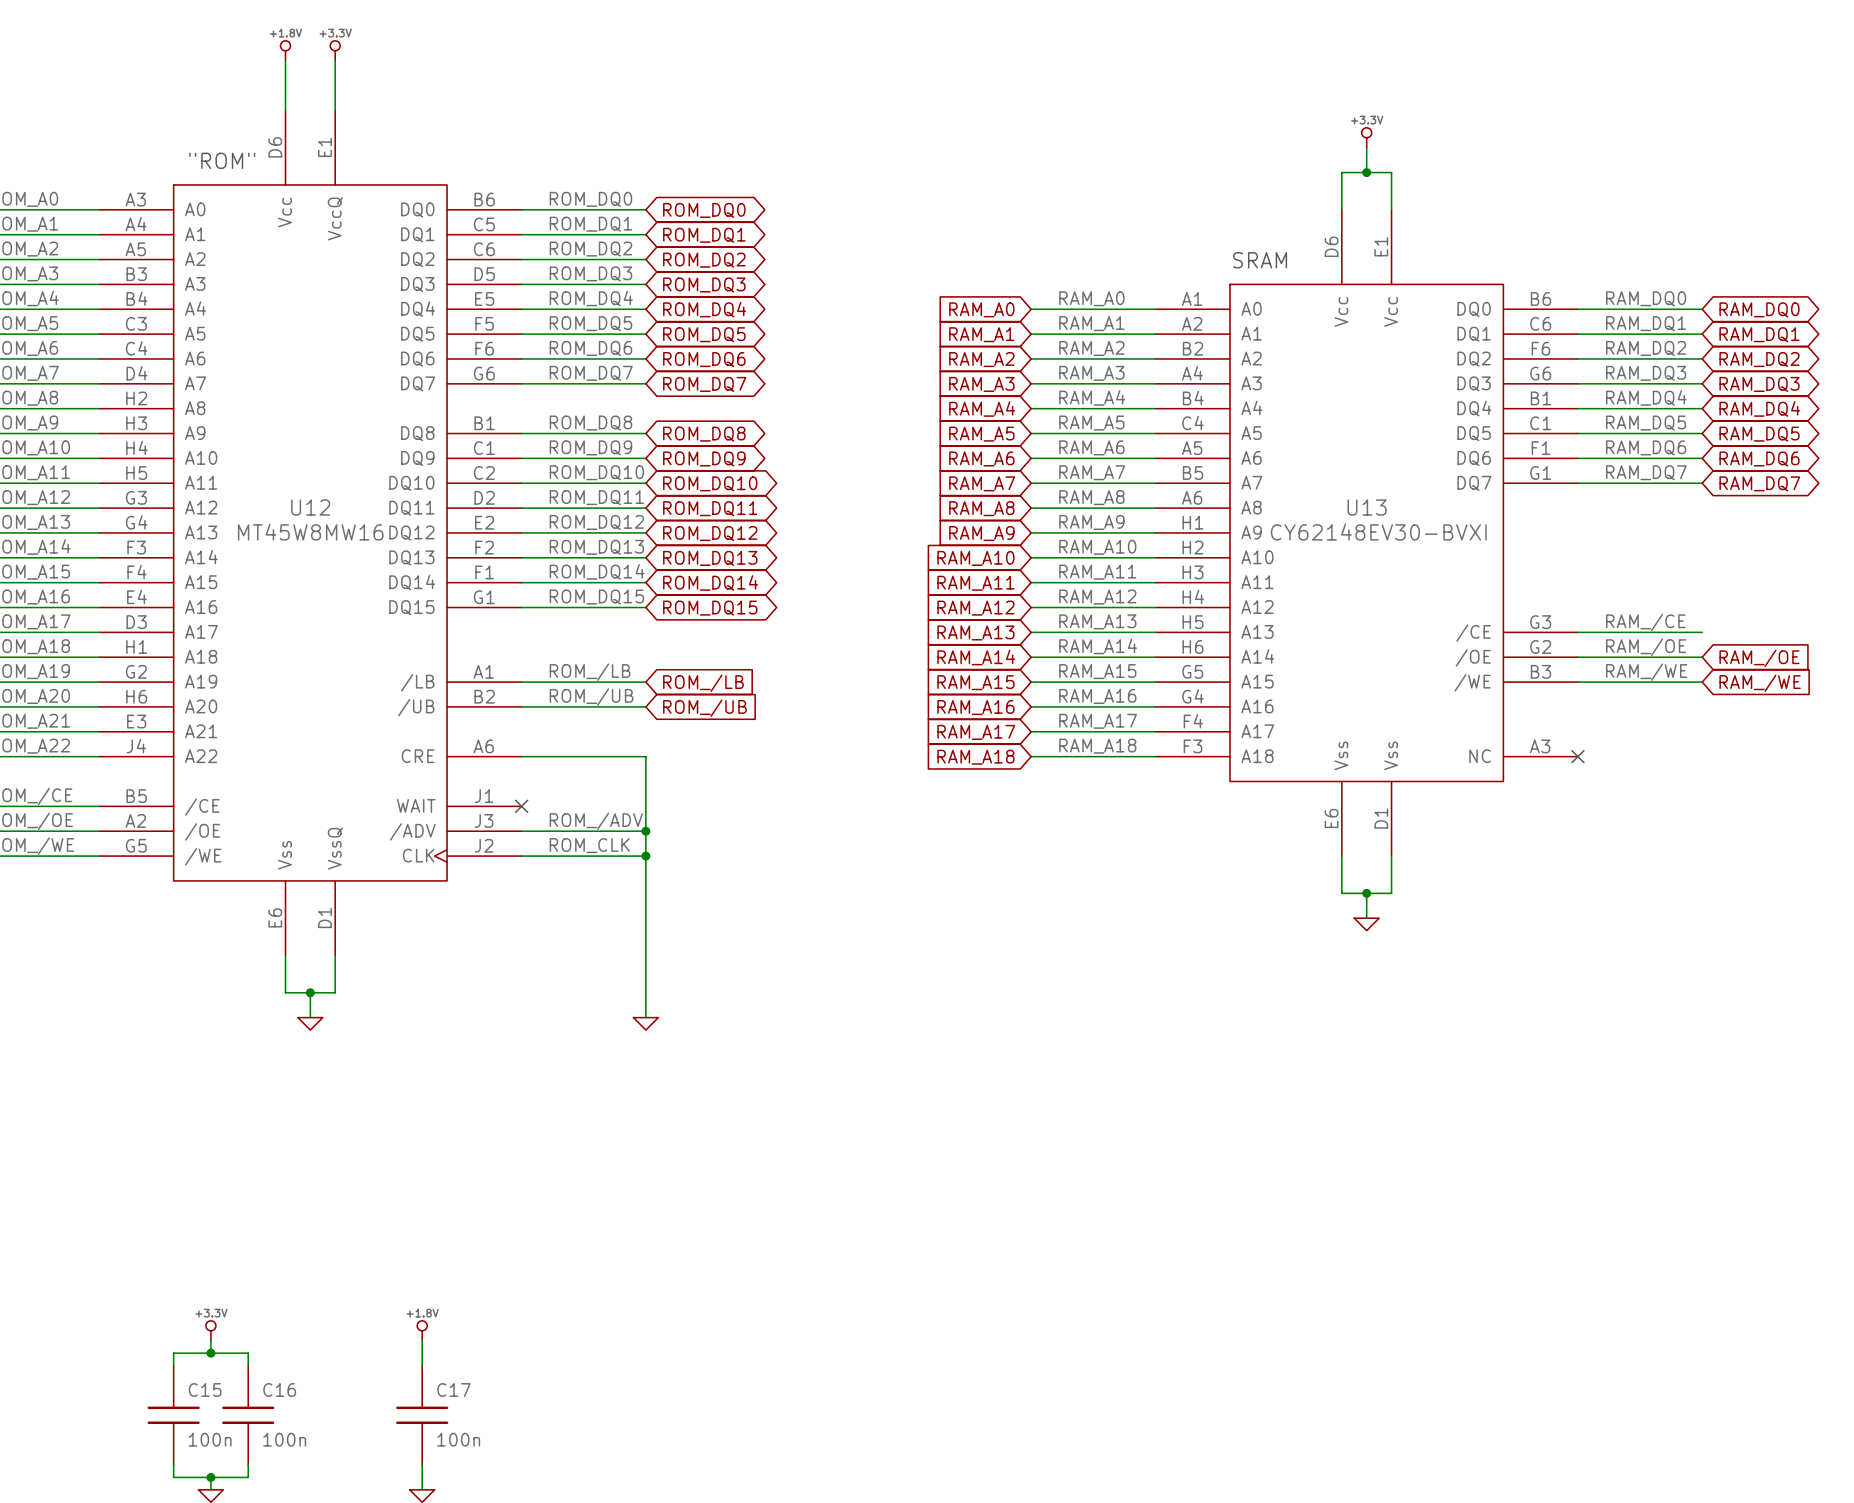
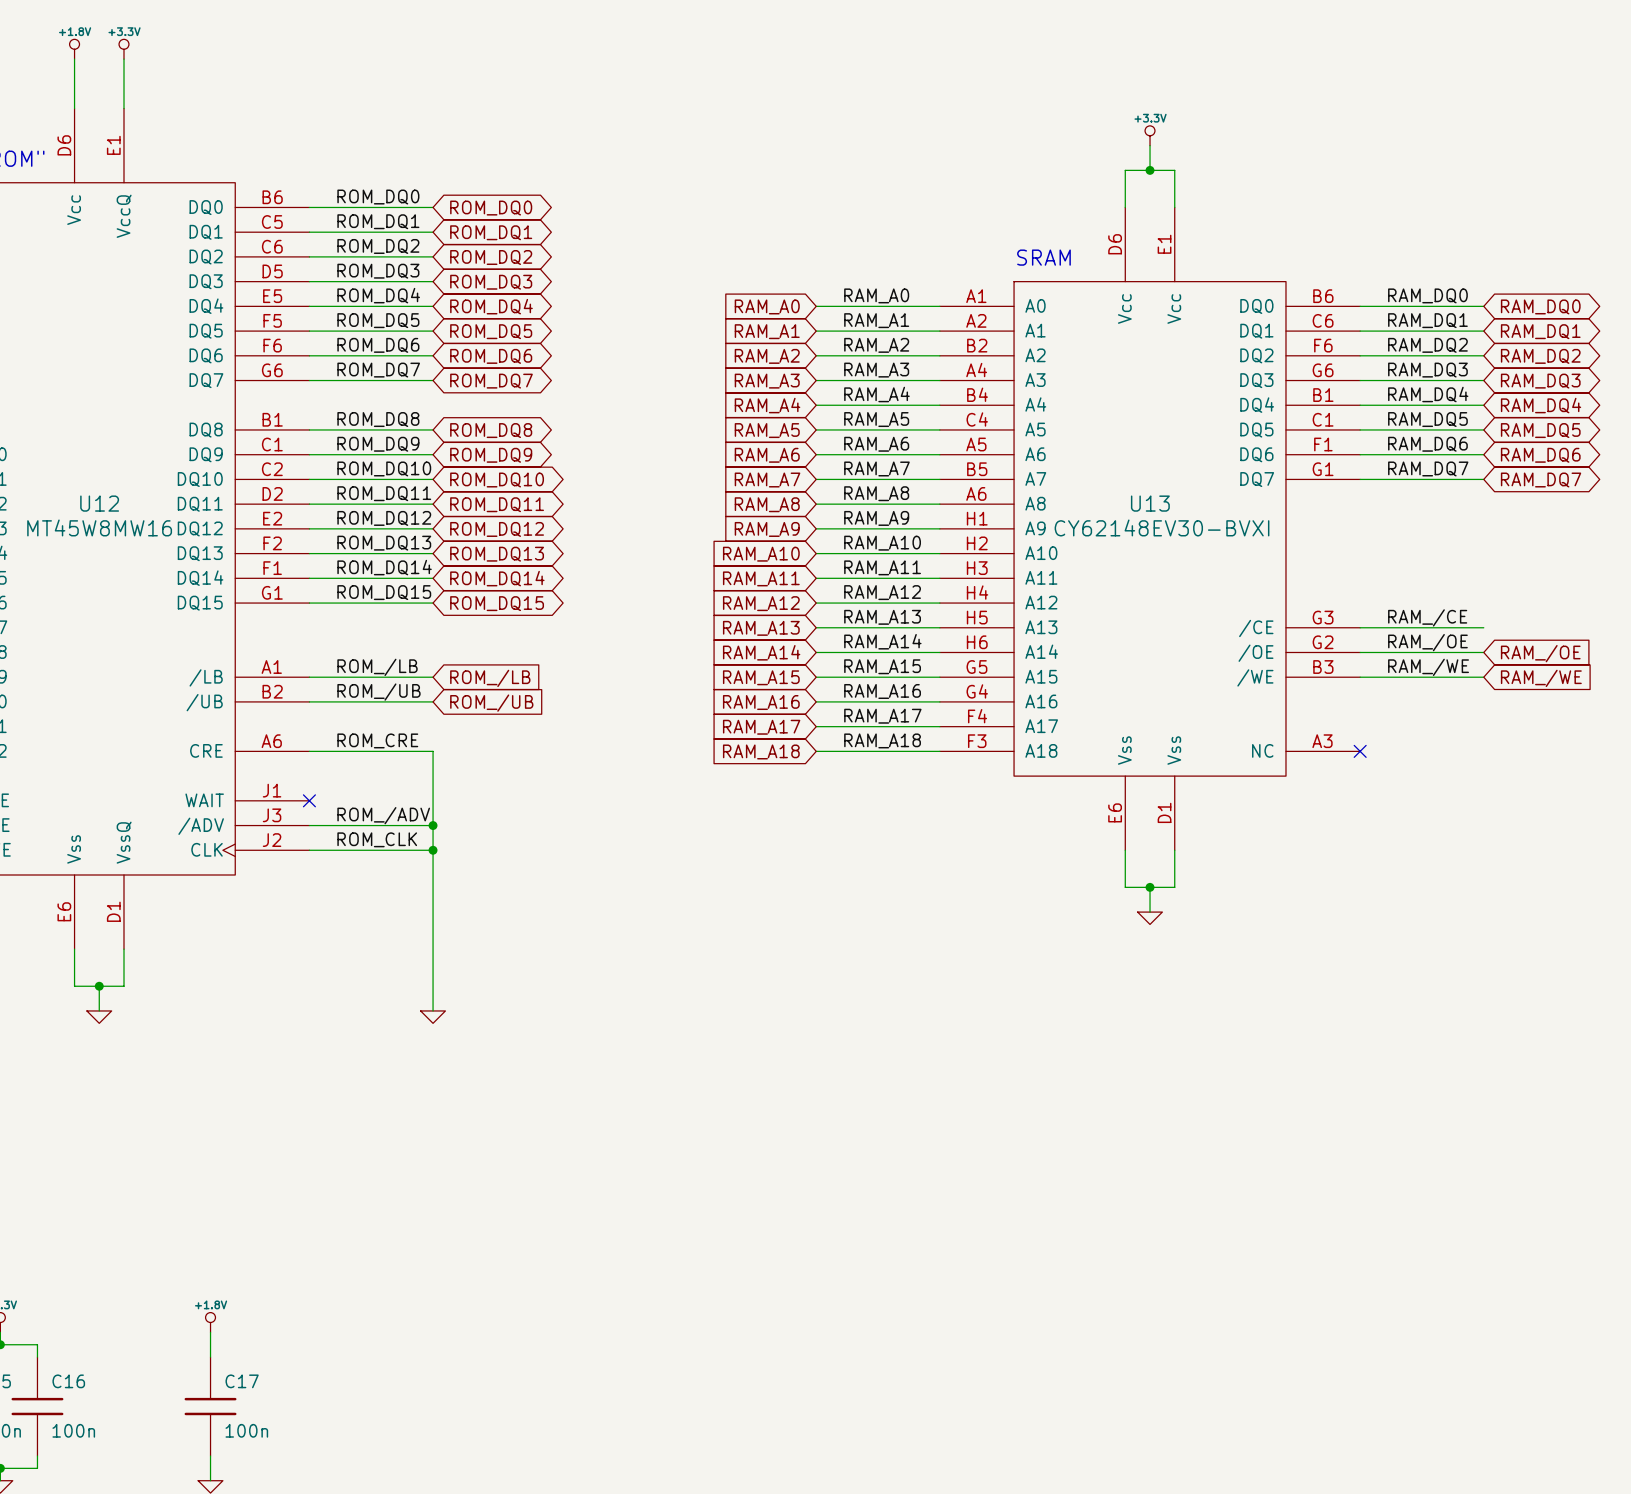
label: none -> ROM_CRE (377, 740)

